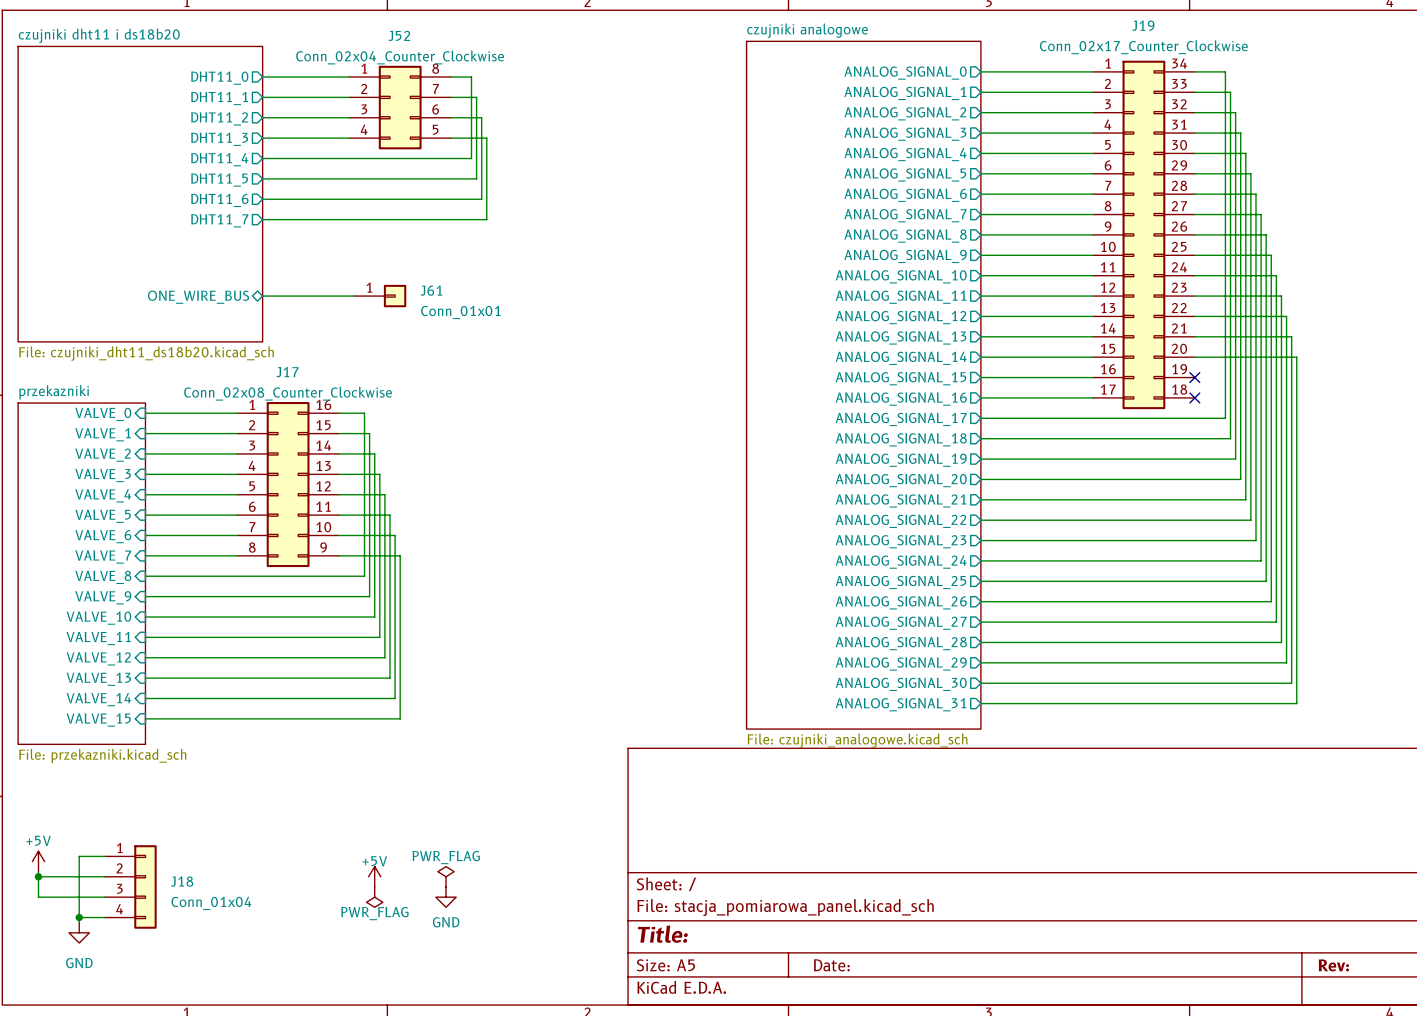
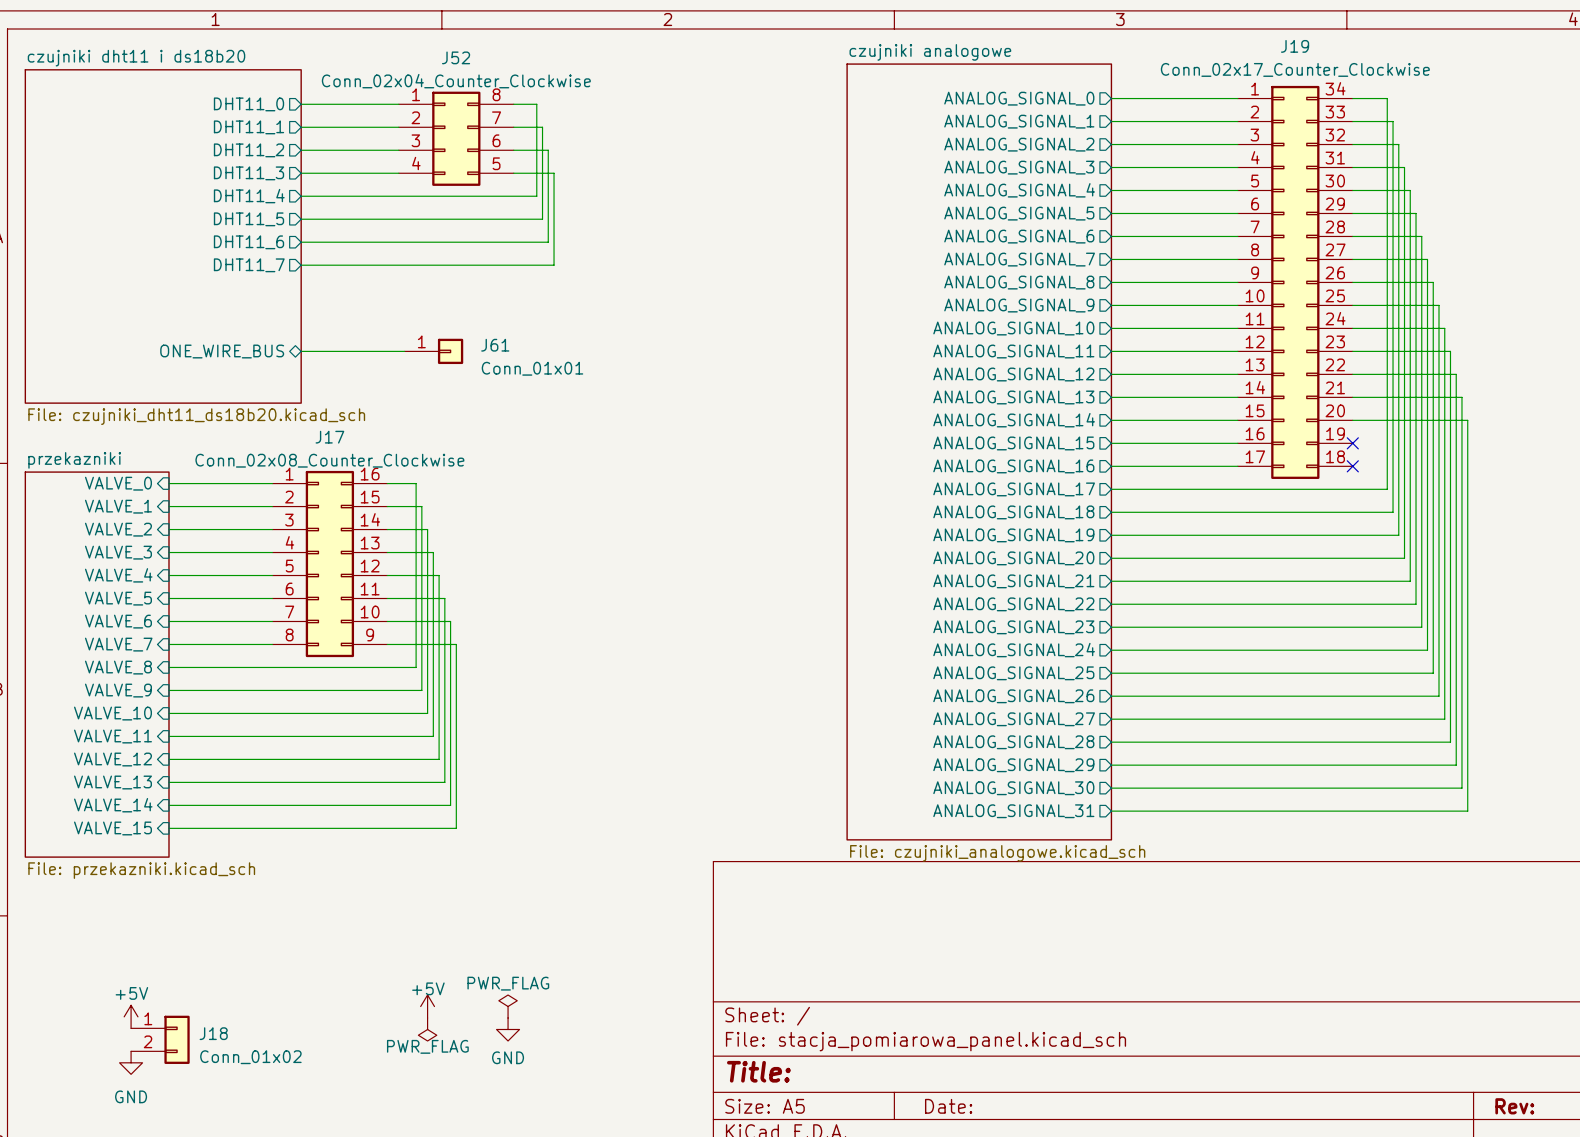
J18 symbol: [104, 845, 157, 929] -> [131, 1015, 190, 1064]
wire: (104, 856) (79, 856) (79, 922) -> none
power symbol position: +5V (38, 861) -> +5V (131, 1016)
wire: (38, 871) (38, 897) (104, 897) -> none
wire: (38, 876) (104, 876) -> none
junction: (38, 876) -> none
J18 value: Conn_01x04 (211, 903) -> Conn_01x02 (250, 1057)
wire: (79, 917) (104, 917) -> none
junction: (79, 917) -> none
power symbol position: GND (79, 932) -> GND (131, 1062)

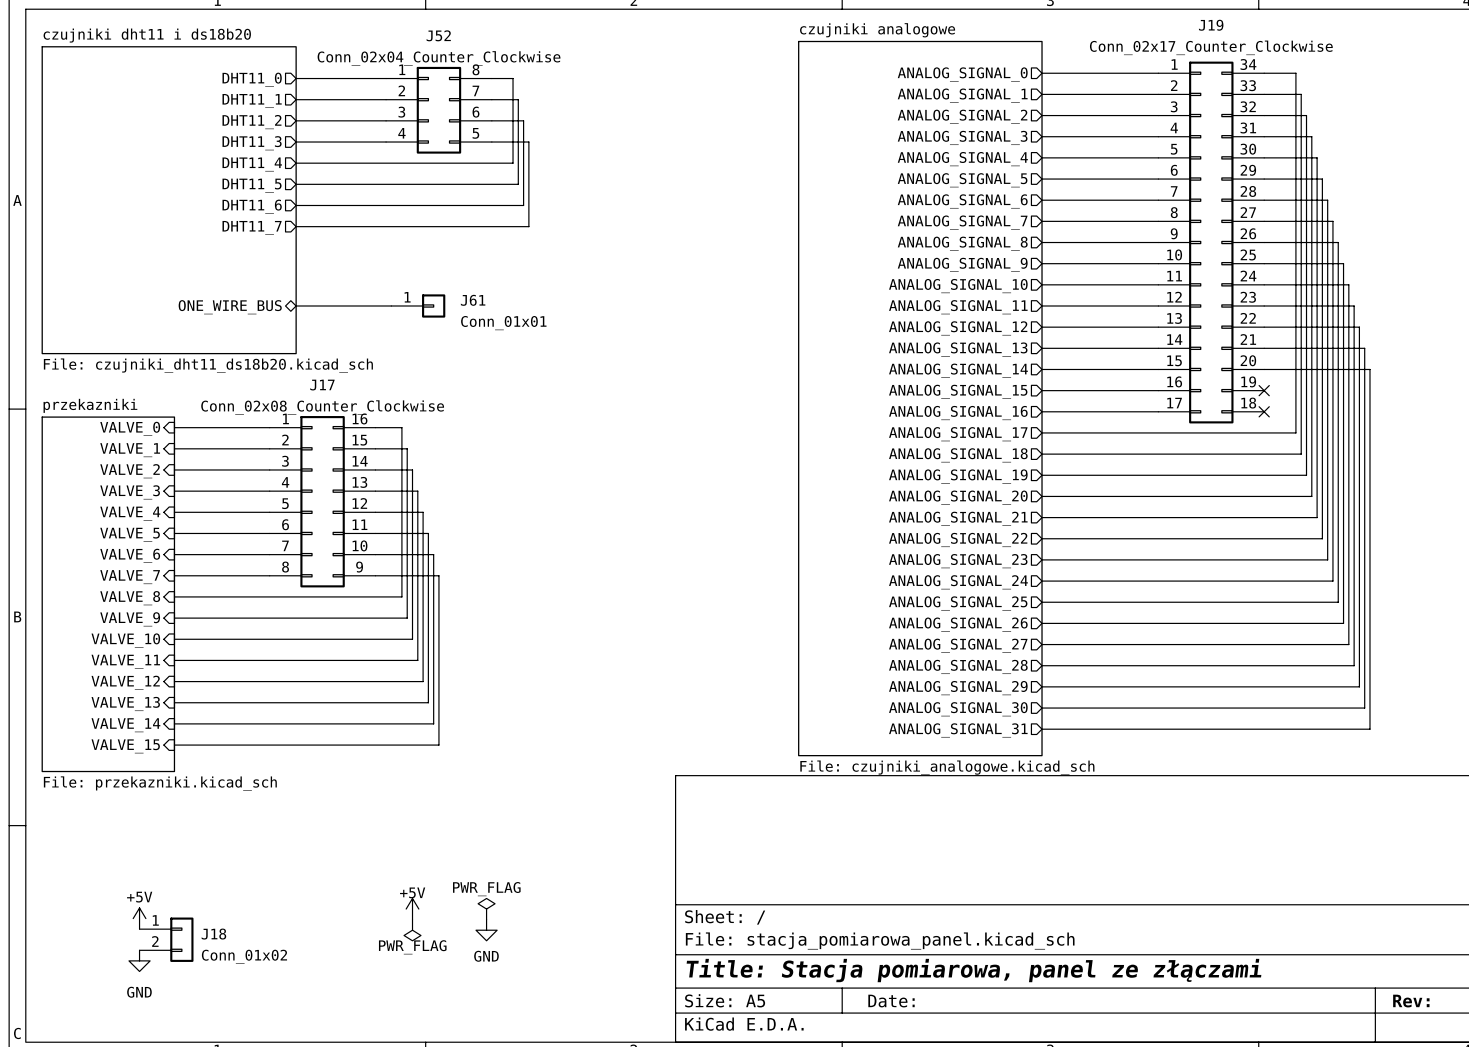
title block: Title: (758, 1071) -> Title: Stacja pomiarowa, panel ze złączami (973, 970)

